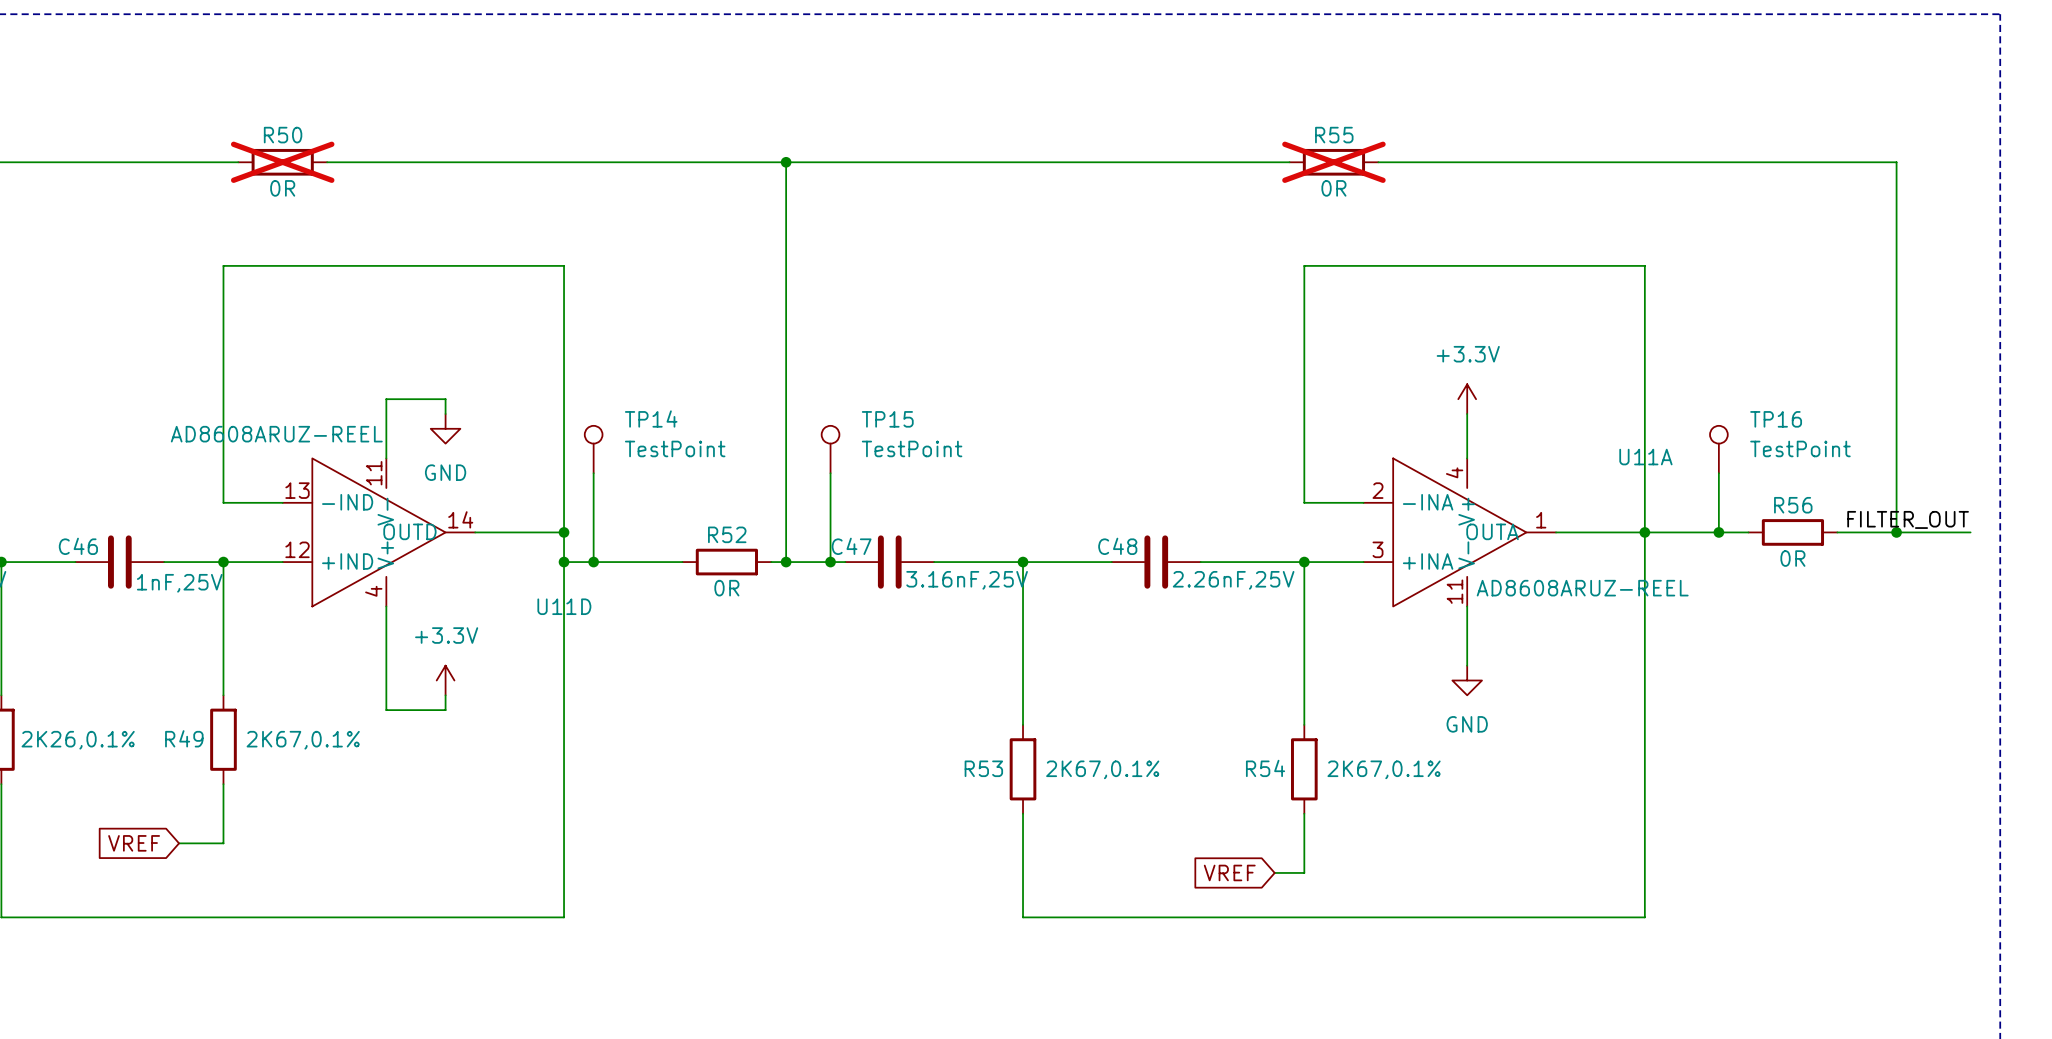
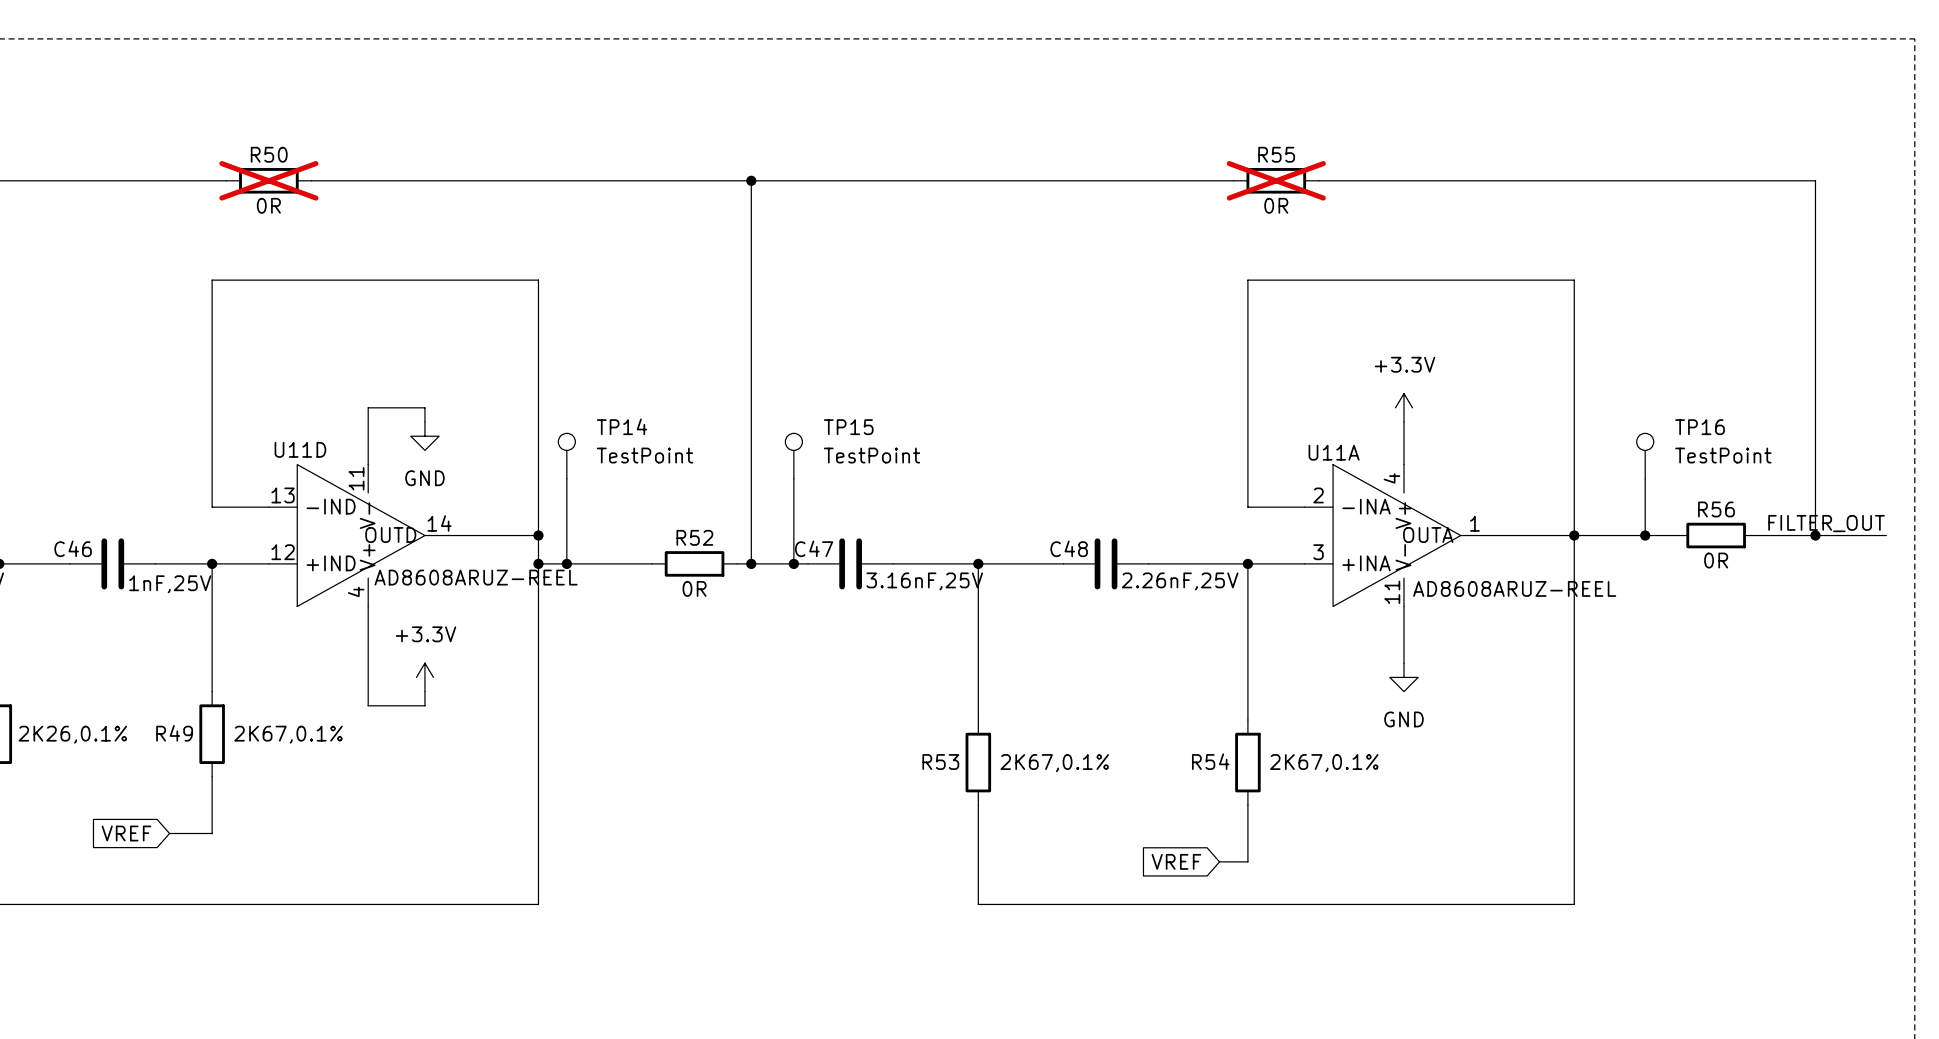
U11D value position: AD8608ARUZ-REEL (276, 434) -> AD8608ARUZ-REEL (476, 577)
U11A name position: U11A (1645, 457) -> U11A (1334, 452)
U11D name position: U11D (564, 606) -> U11D (300, 449)

